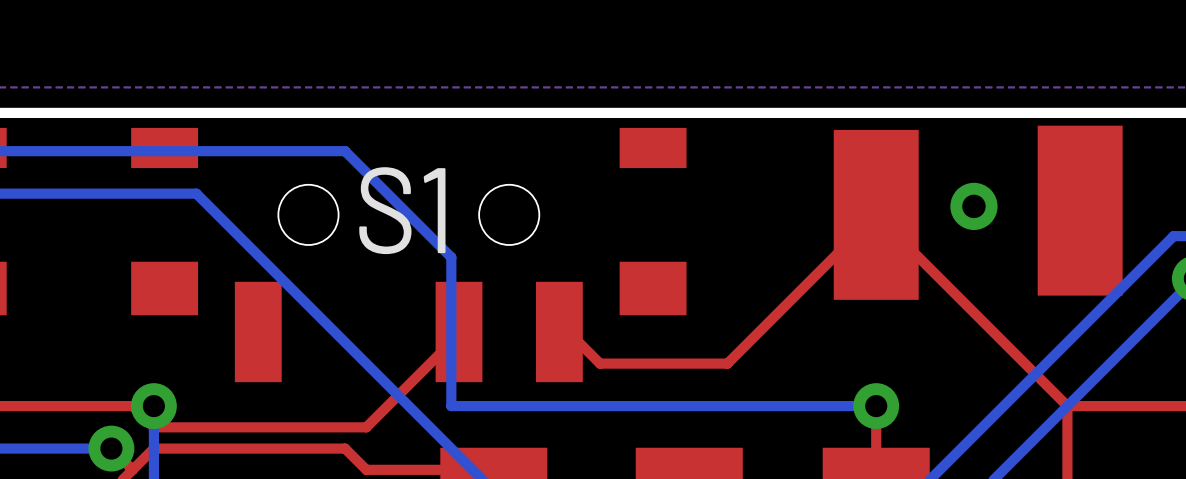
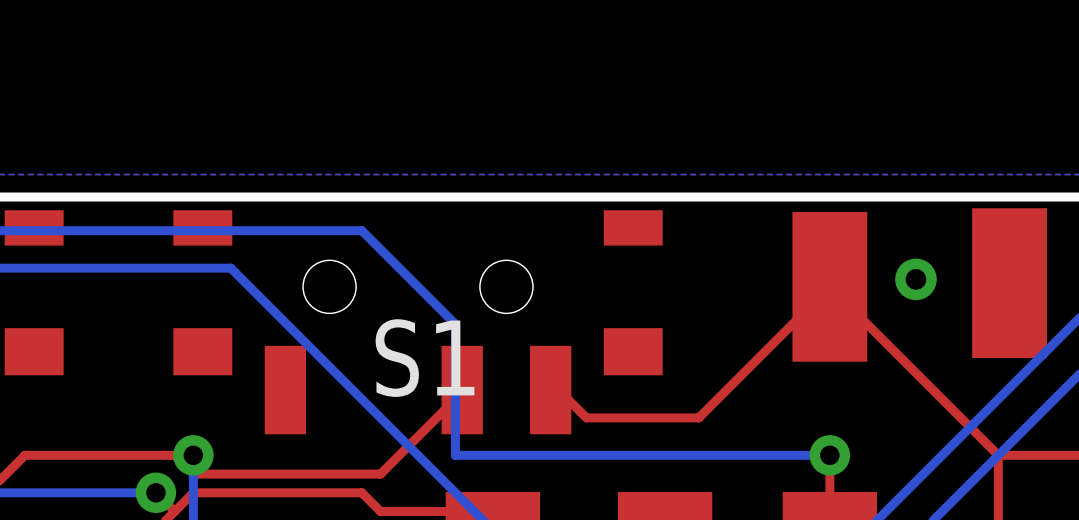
text position: S1 (402, 210) -> S1 (425, 358)

